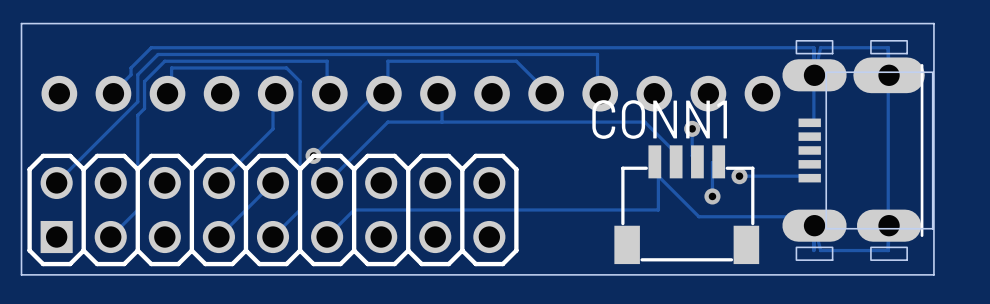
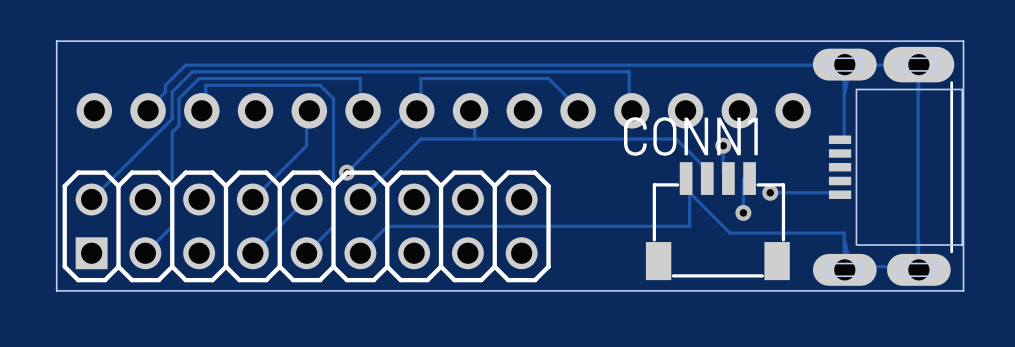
part footprint: [782, 40, 933, 261] -> [812, 46, 963, 286]

